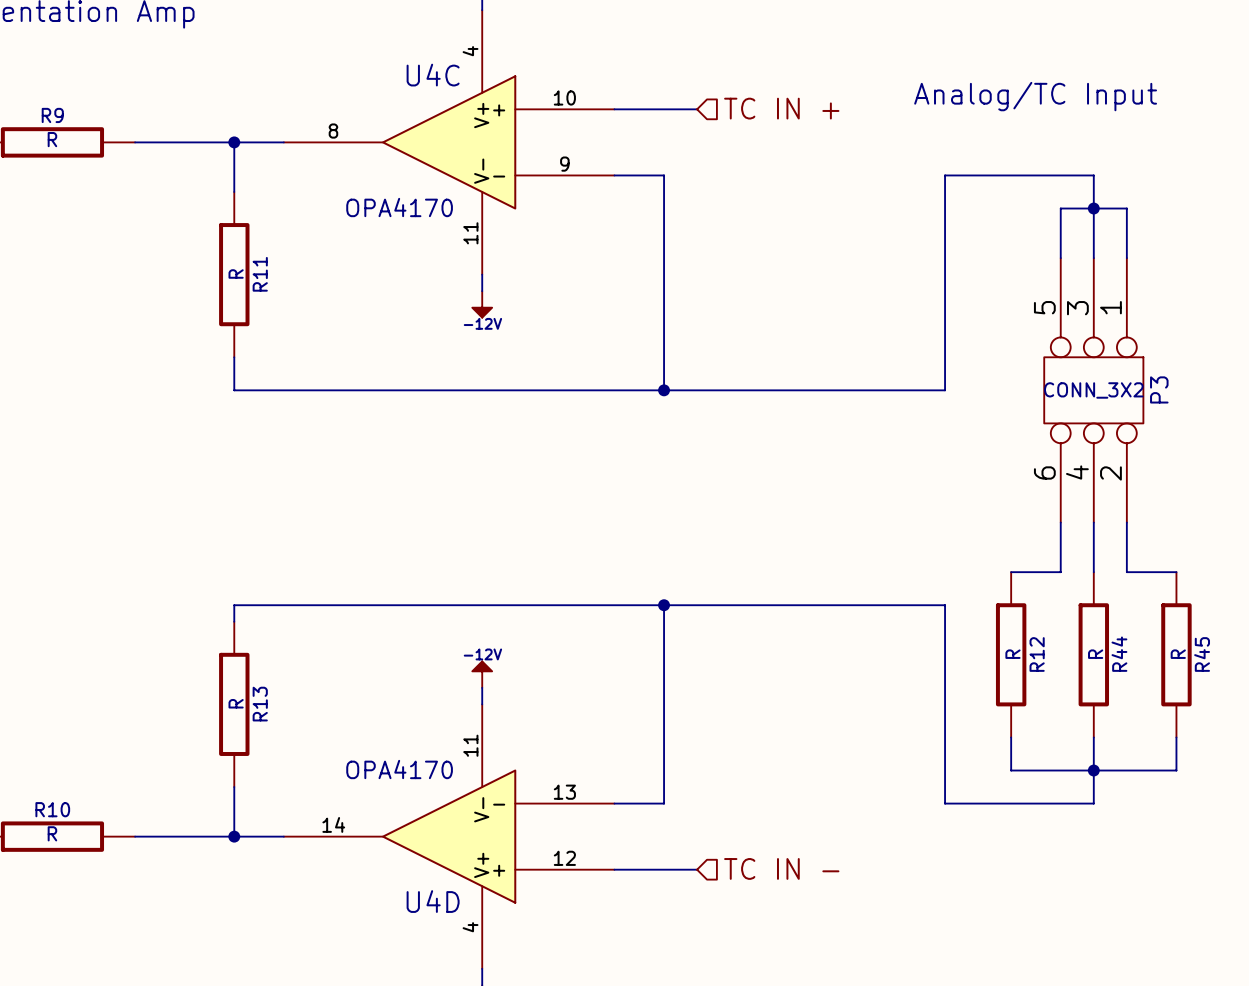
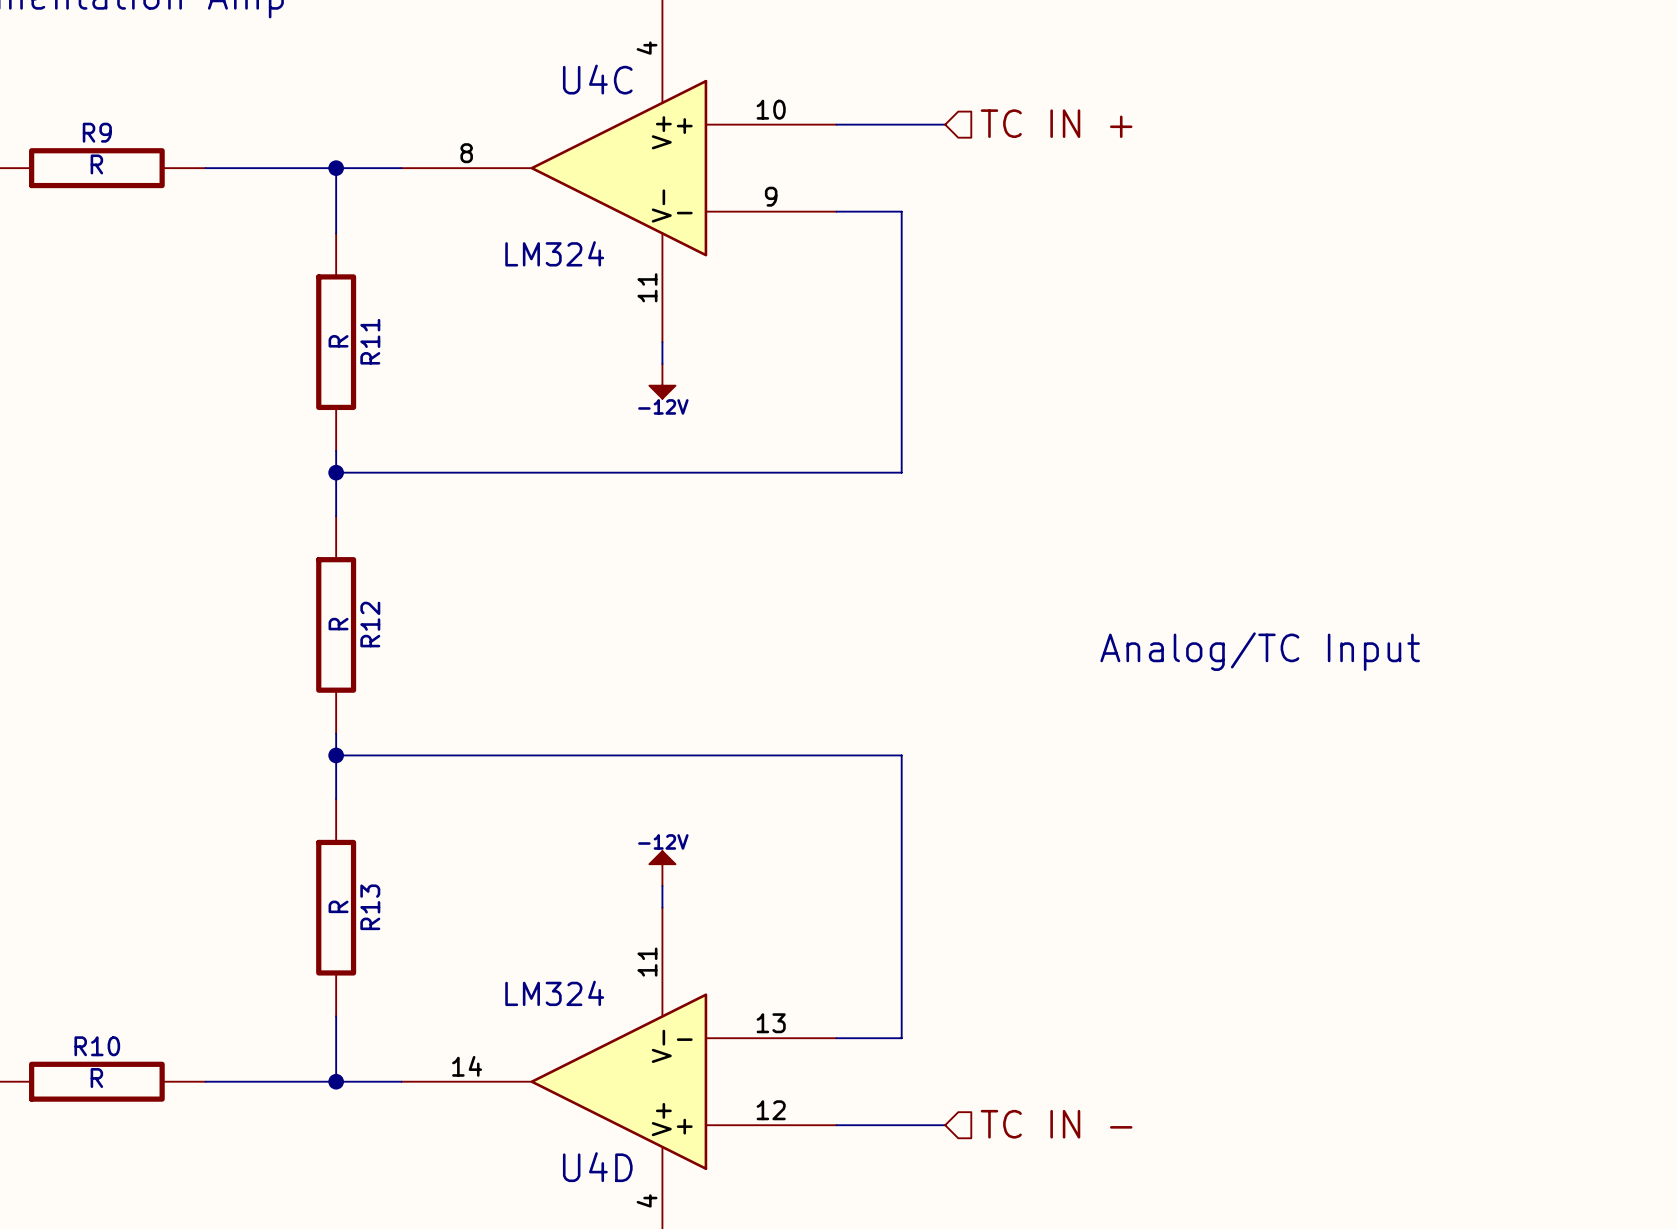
text: Analog/TC Input (1035, 96) -> none
U4C value: OPA4170 (399, 207) -> LM324 (554, 253)
junction: (1093, 208) -> none
wire: (1060, 258) (1060, 208) (1126, 208) (1126, 258) -> none
wire: (1093, 258) (1093, 175) (945, 175) (945, 390) (234, 390) -> (336, 516) (336, 494)
junction: none -> (336, 472)
wire: (664, 373) (664, 390) -> (901, 472) (336, 472)
junction: (664, 390) -> none
P3: CONN_3X2 (1093, 390) -> none
text: none -> Analog/TC Input (1260, 651)
wire: (1060, 522) (1060, 572) (1011, 572) -> none
wire: (1093, 522) (1093, 572) -> none
wire: (1126, 522) (1126, 572) (1176, 572) -> none
wire: none -> (336, 755) (901, 755) (901, 777)
junction: none -> (336, 755)
wire: (234, 605) (945, 605) (945, 803) (1093, 803) (1093, 737) -> (336, 777) (336, 733)
junction: (664, 605) -> none
R12 position: (1011, 654) -> (336, 624)
R44: R (1093, 654) -> none
R45: R (1176, 654) -> none
wire: (1011, 737) (1011, 770) (1176, 770) (1176, 737) -> none
U4D value: OPA4170 (399, 769) -> LM324 (554, 993)
junction: (1093, 770) -> none

